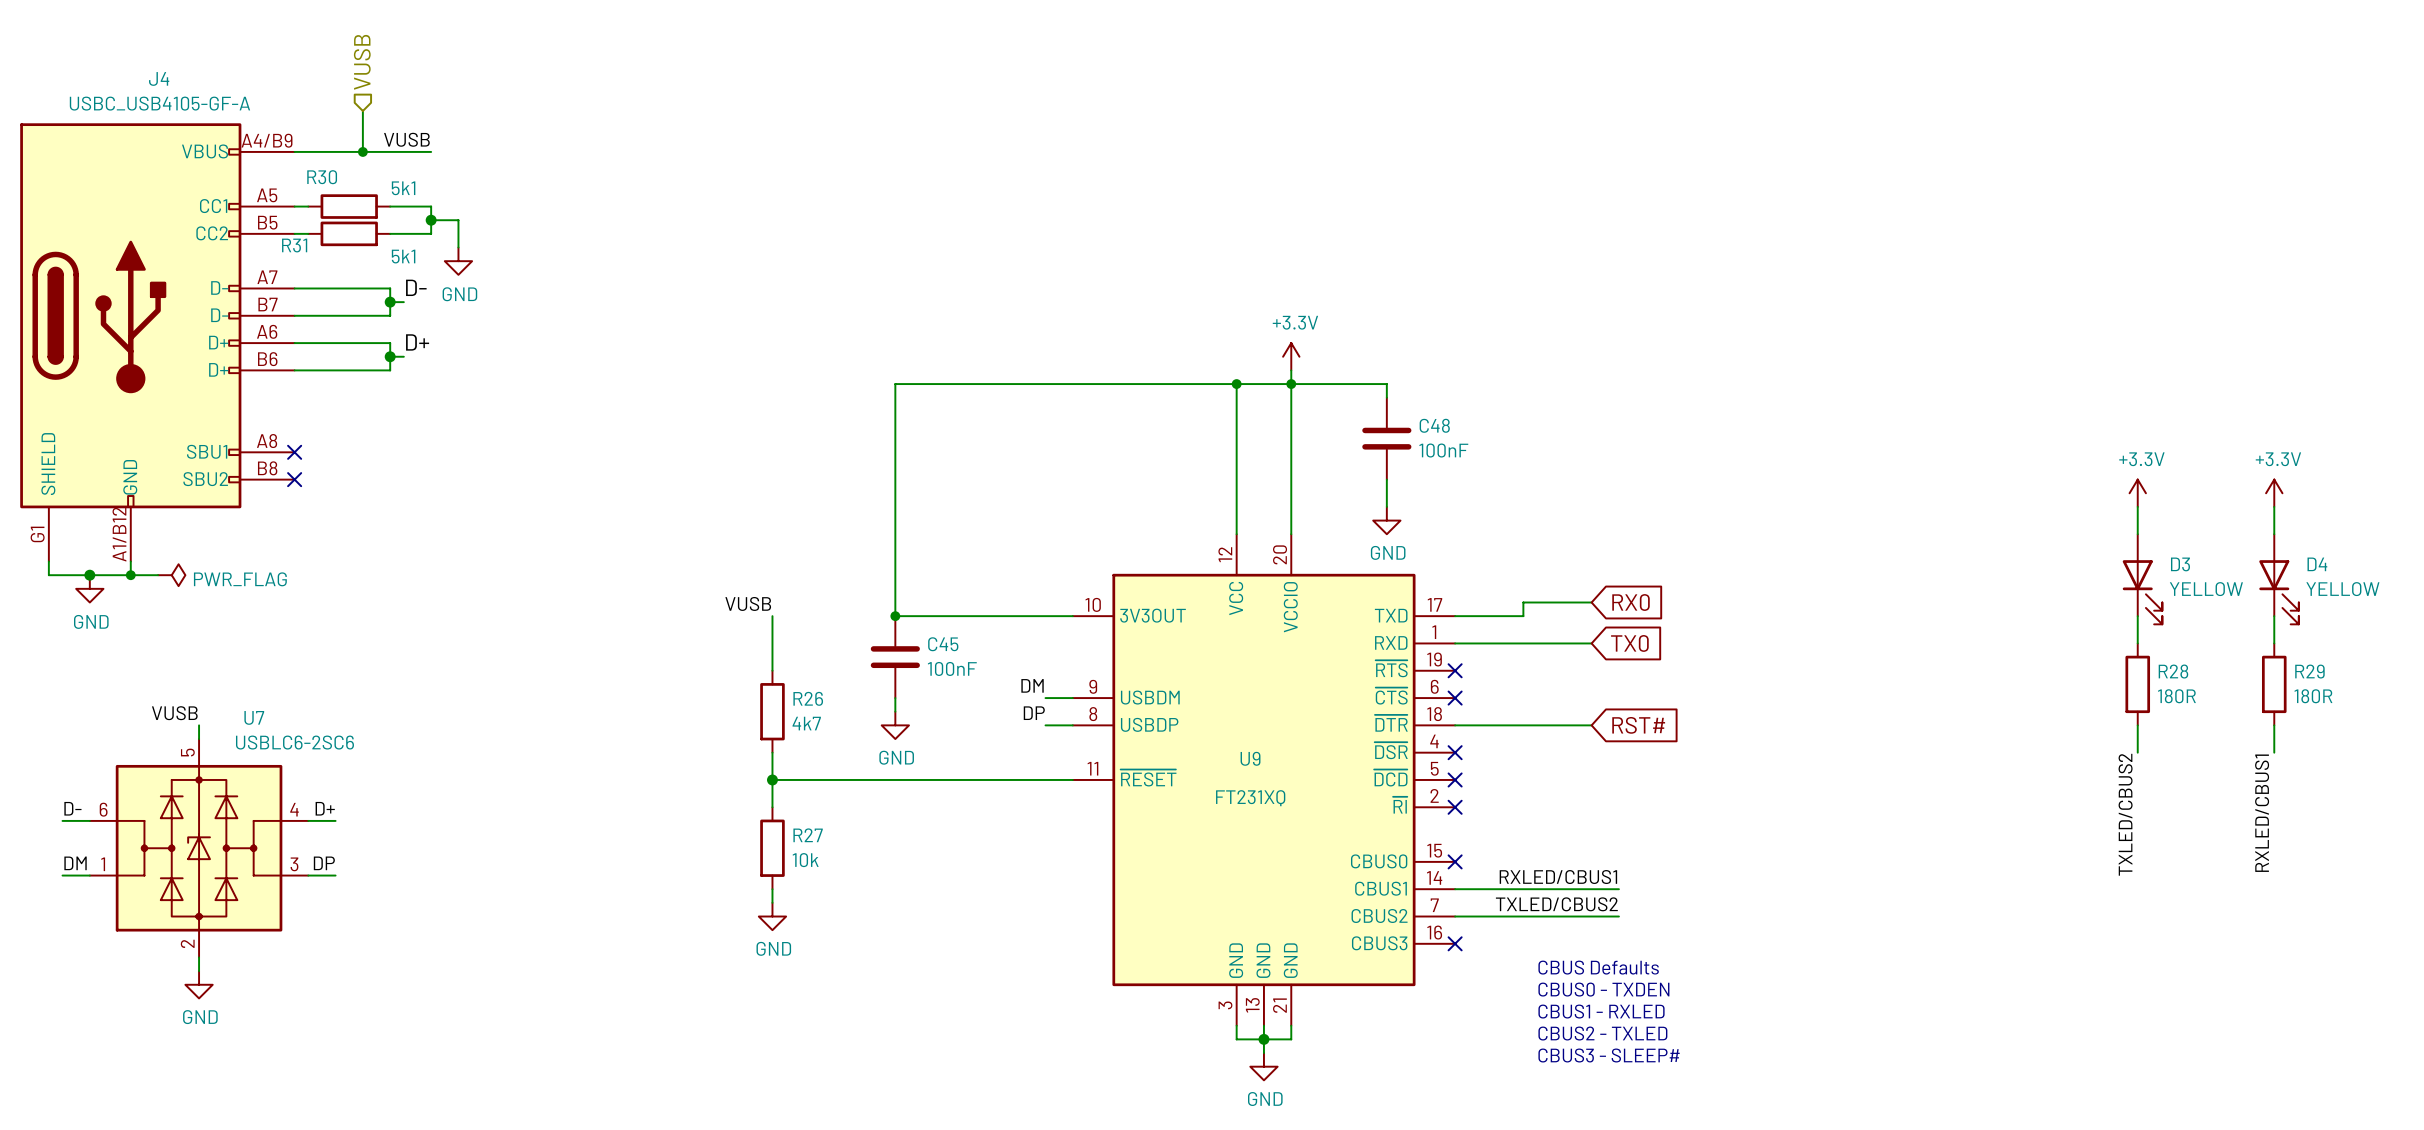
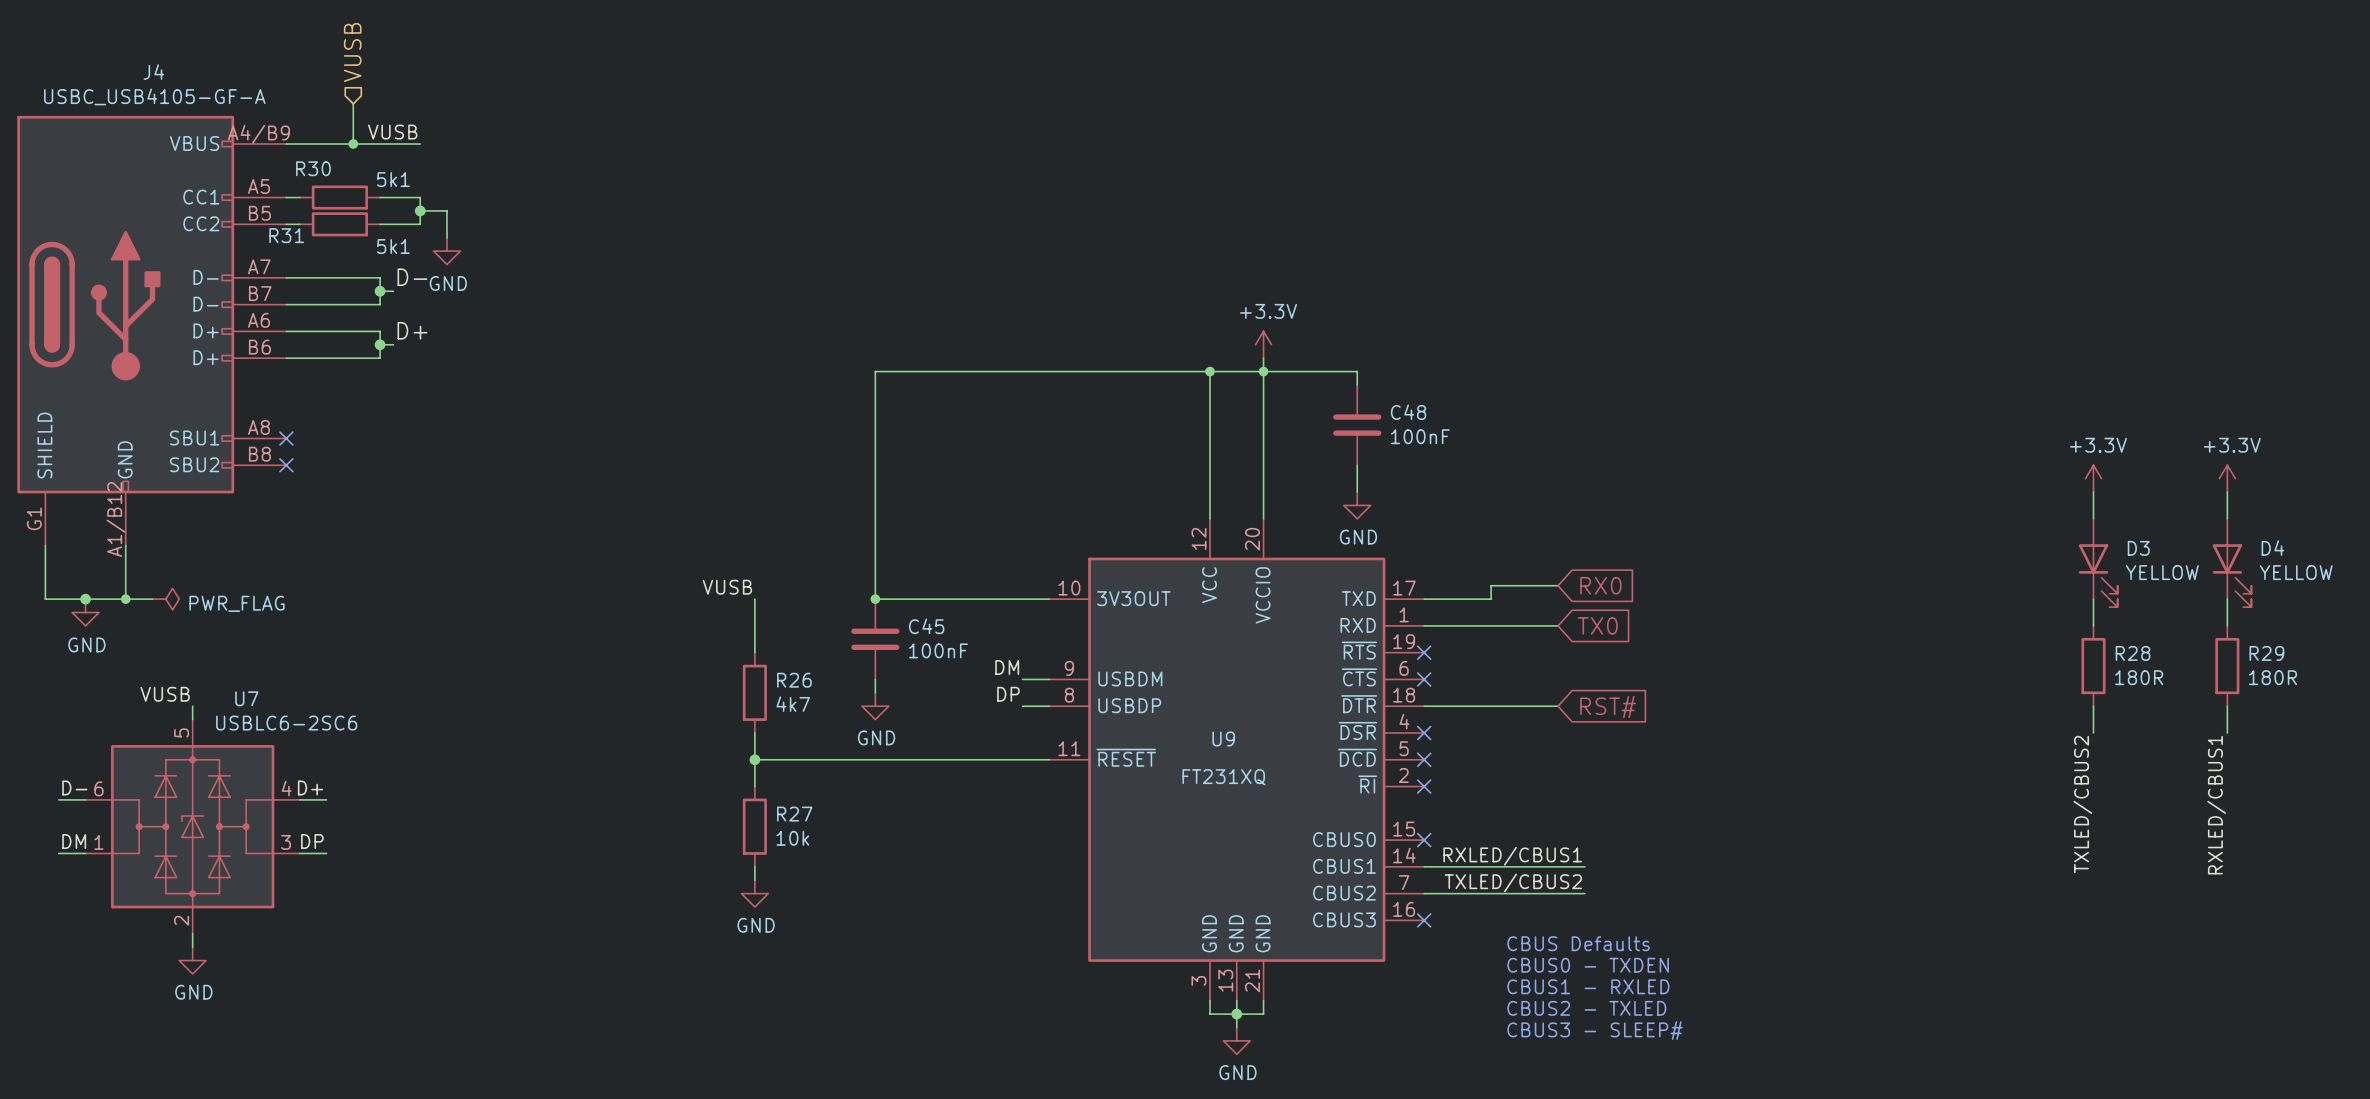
wire: (48, 575) (158, 575) -> (45, 558) (45, 599) (152, 599)
junction position: (89, 575) -> (85, 599)
wire: none -> (125, 558) (125, 599)
junction position: (130, 575) -> (125, 599)
power symbol position: PWR_FLAG (171, 575) -> PWR_FLAG (165, 599)
power symbol position: GND (89, 588) -> GND (85, 612)

